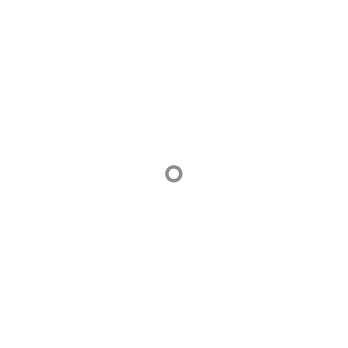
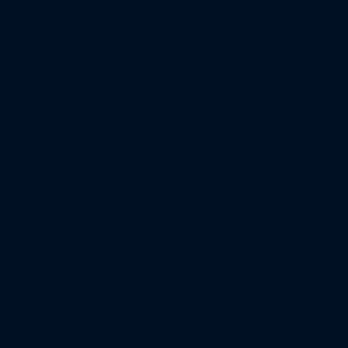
via: (173, 173) -> none

